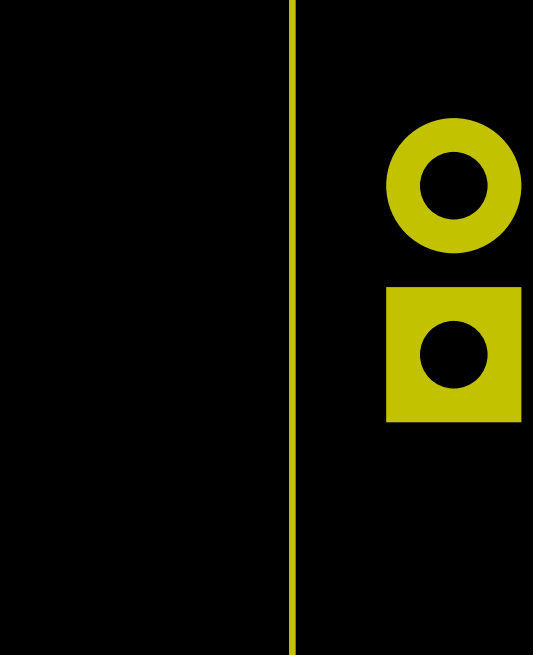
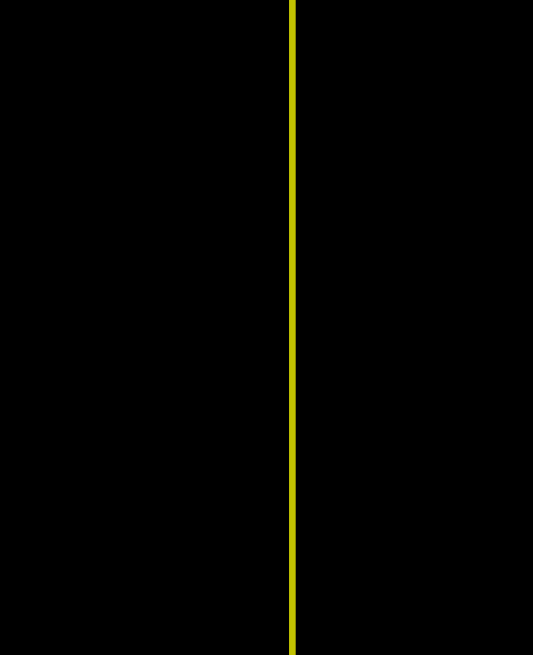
part: (453, 270) -> none

